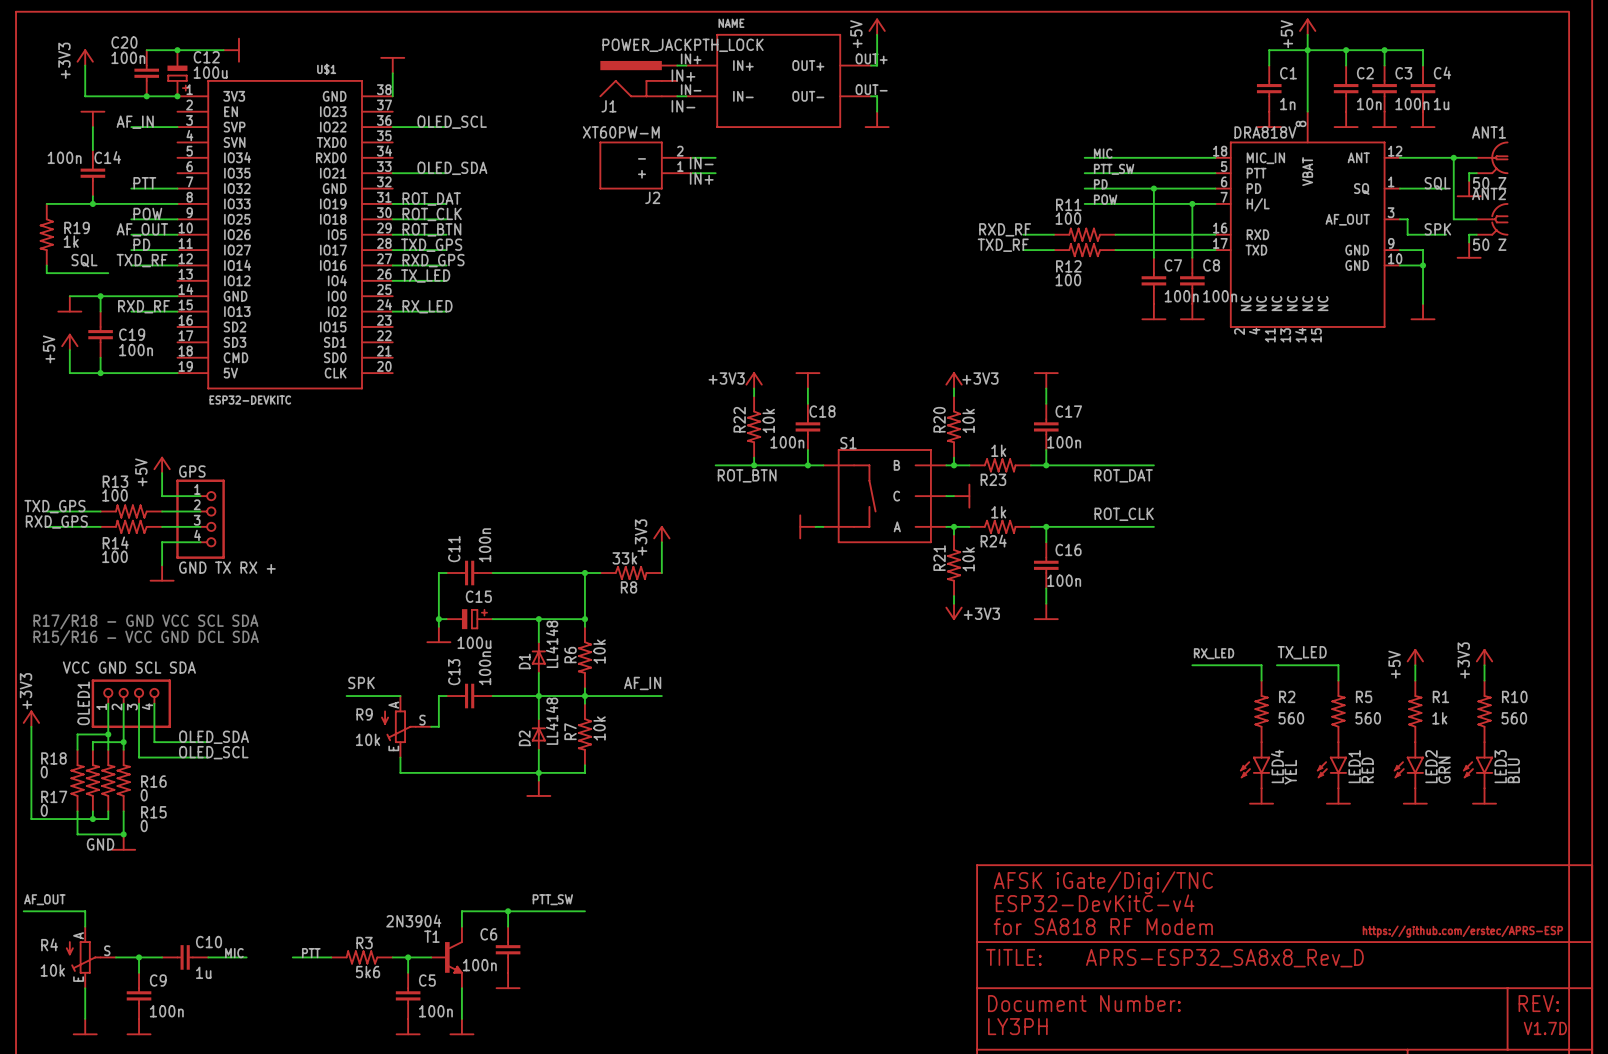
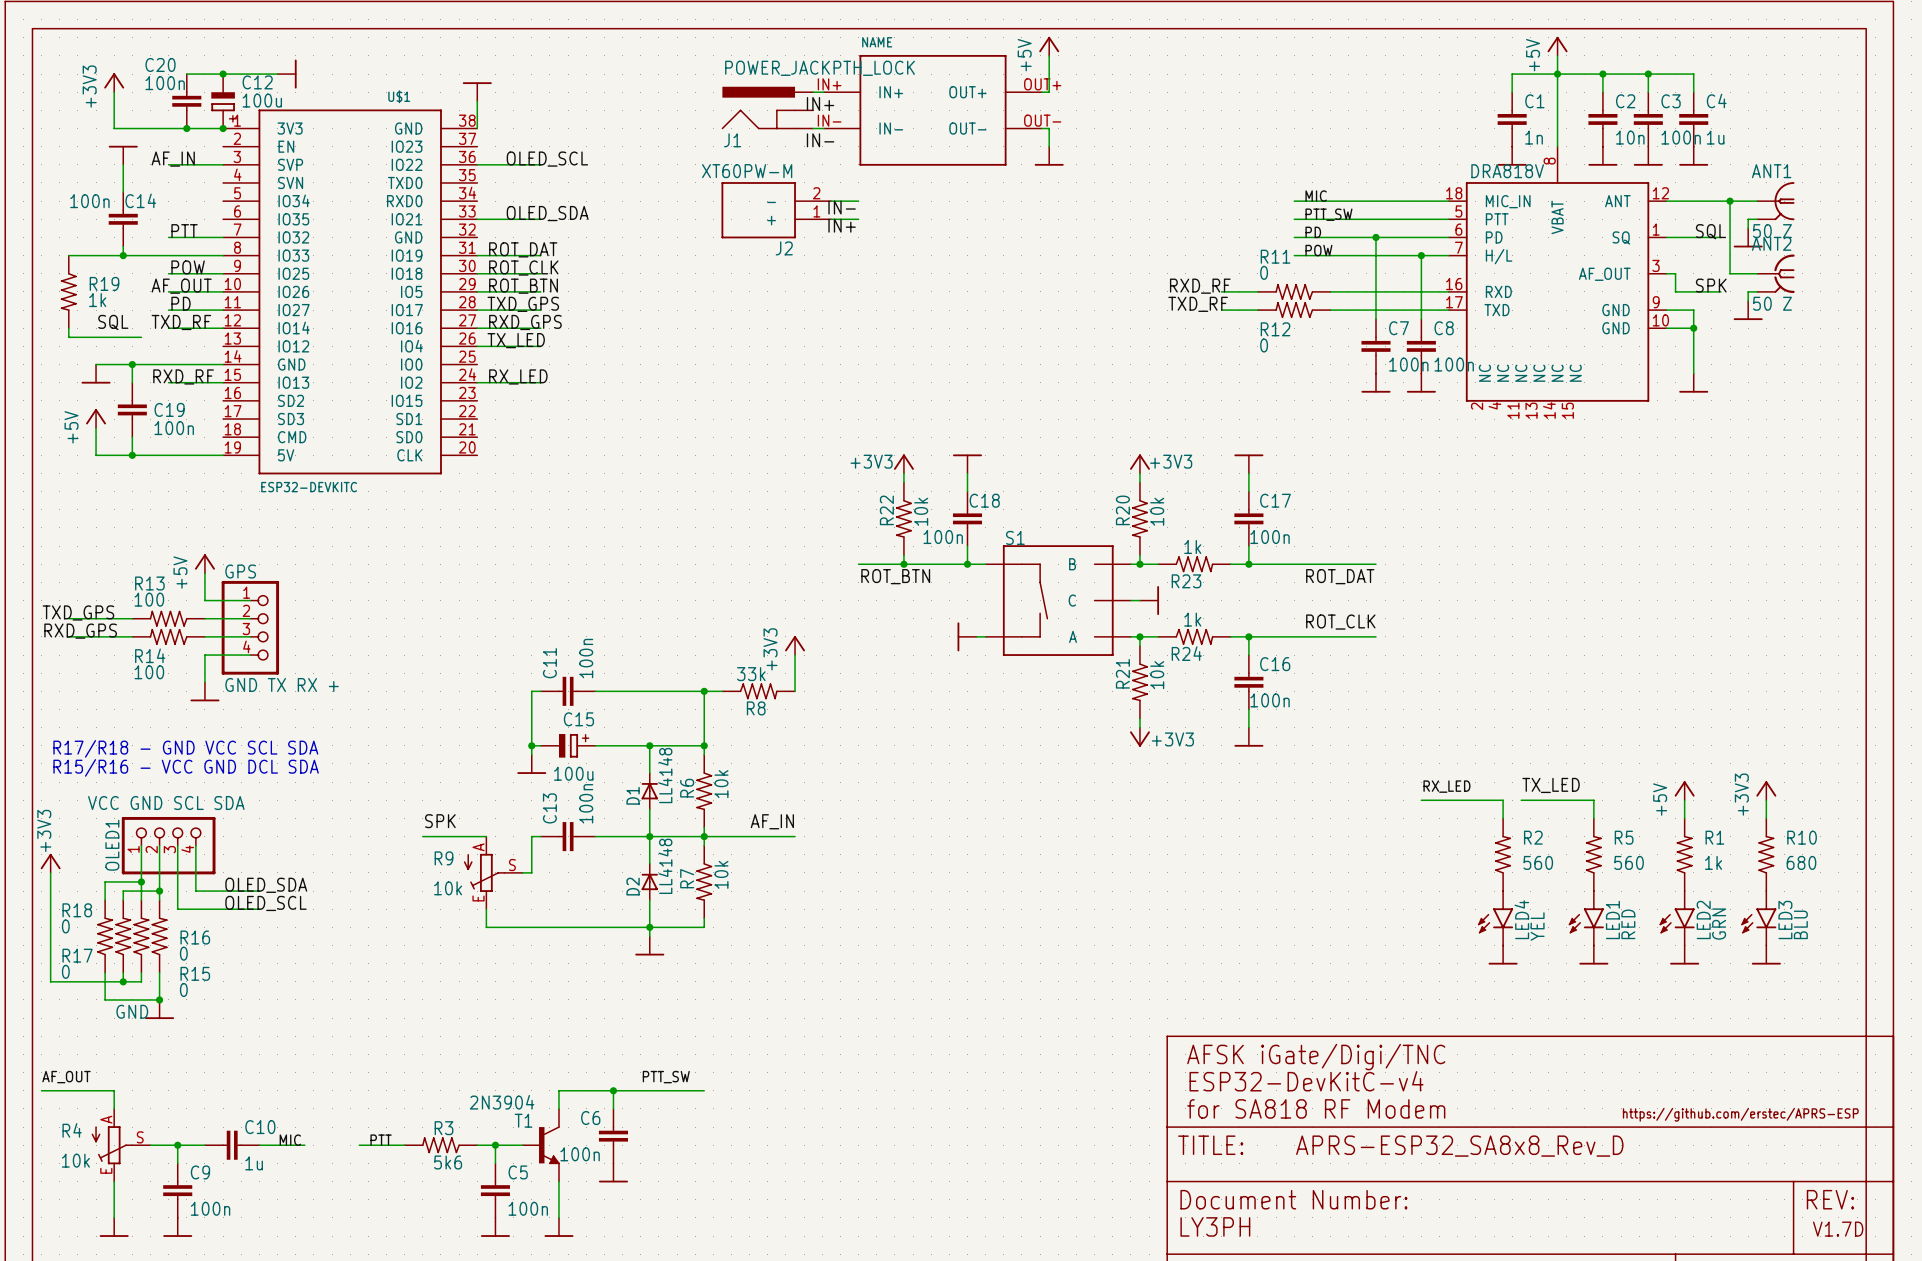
R11 value: 100 (1068, 218) -> 0 (1264, 272)
R12 value: 100 (1068, 280) -> 0 (1264, 345)
R10 value: 560 (1514, 718) -> 680 (1801, 862)

